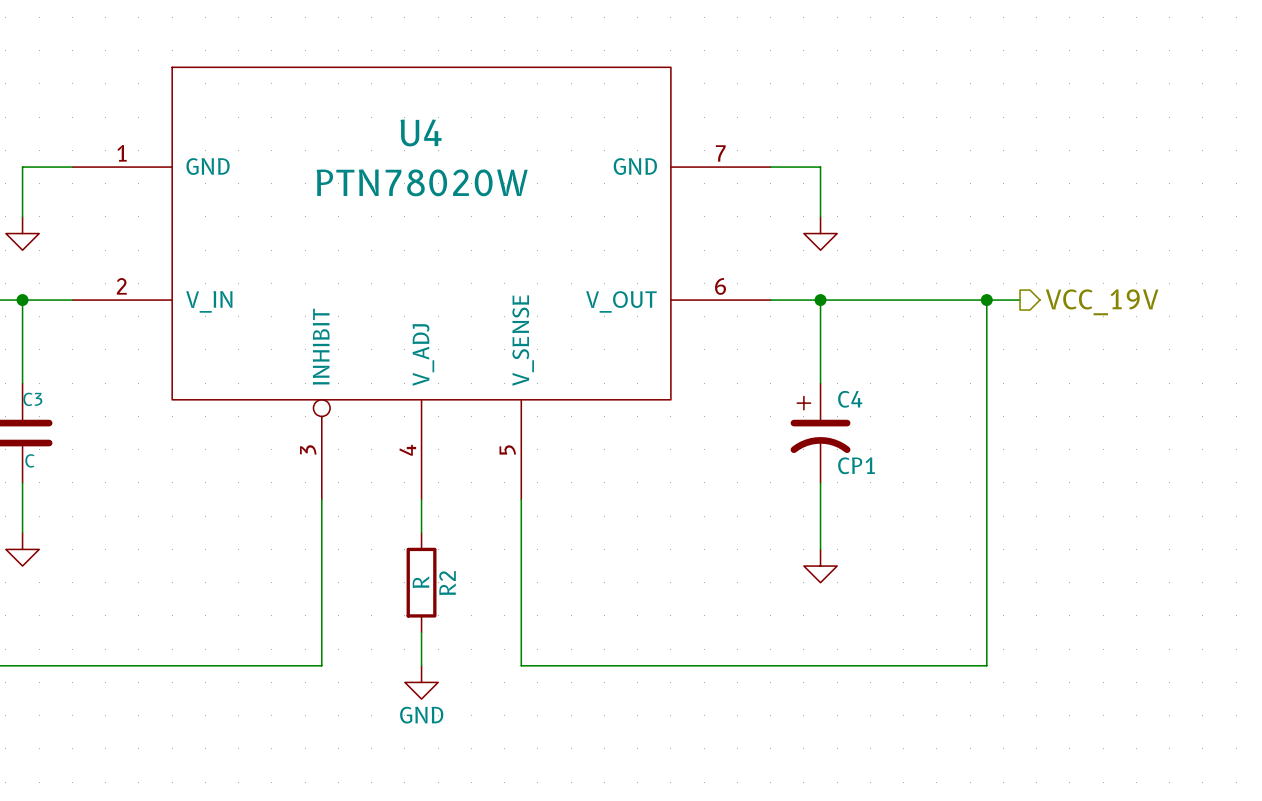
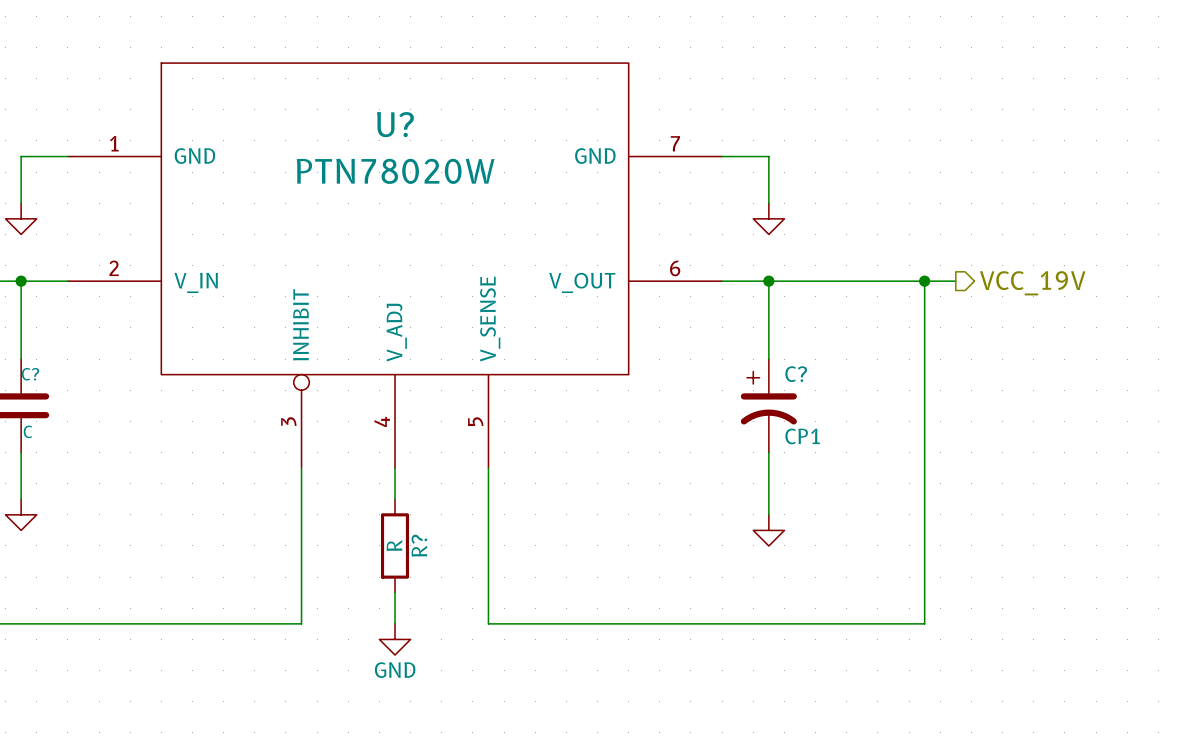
U4 name: U4 (421, 132) -> U? (395, 124)
C3 name: C3 (32, 399) -> C? (30, 374)
C4 name: C4 (850, 399) -> C? (796, 374)
R2 name: R2 (447, 583) -> R? (419, 545)

